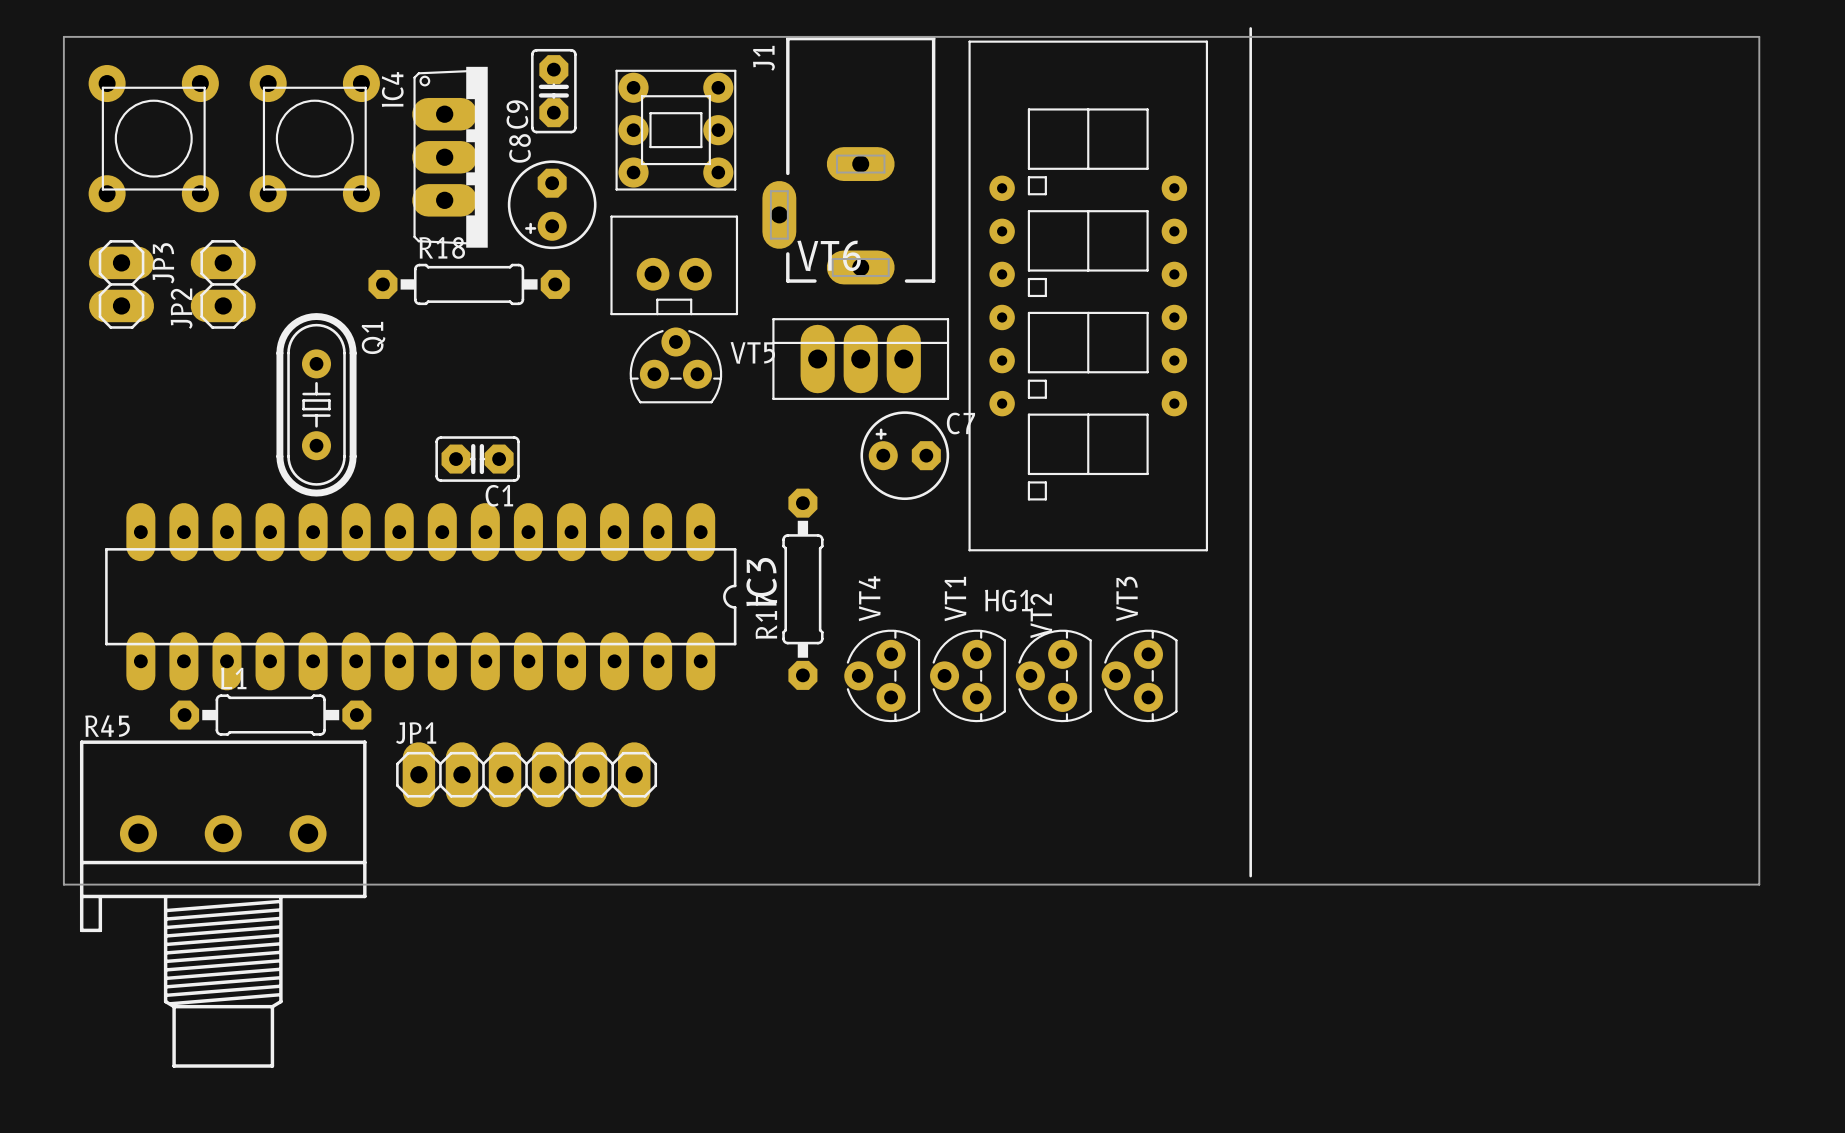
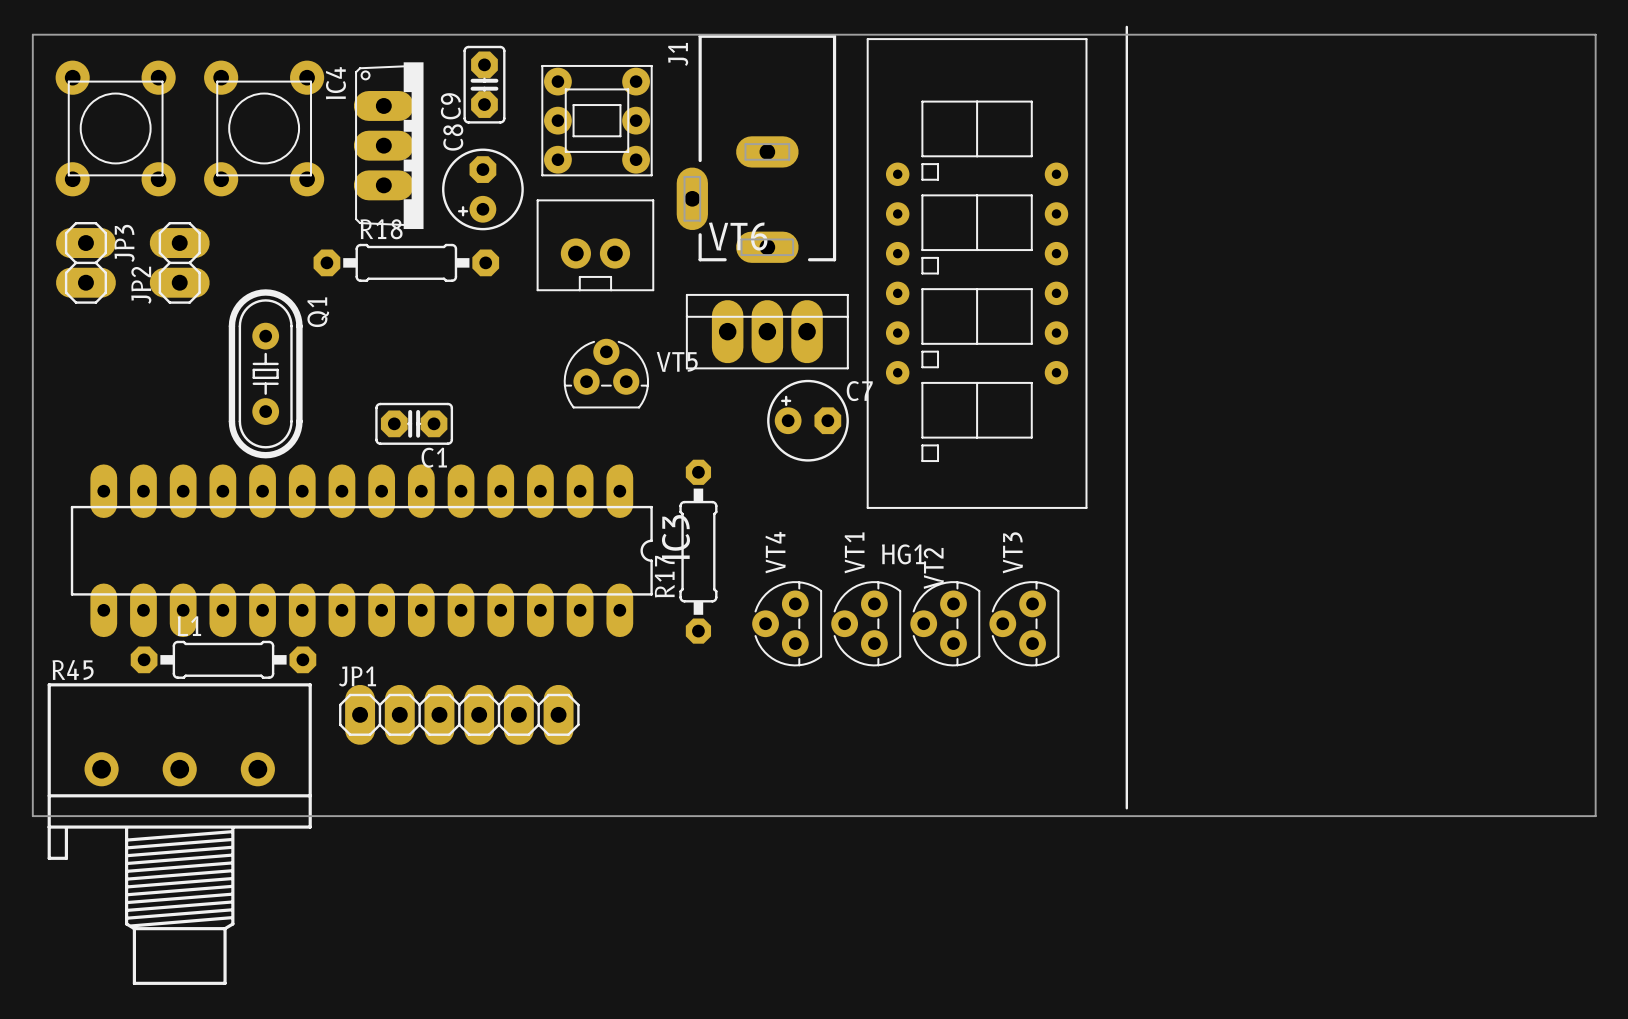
VT5 footprint: [629, 327, 723, 404] -> [563, 338, 649, 409]
R17 footprint: [782, 488, 824, 690] -> [679, 459, 718, 644]

